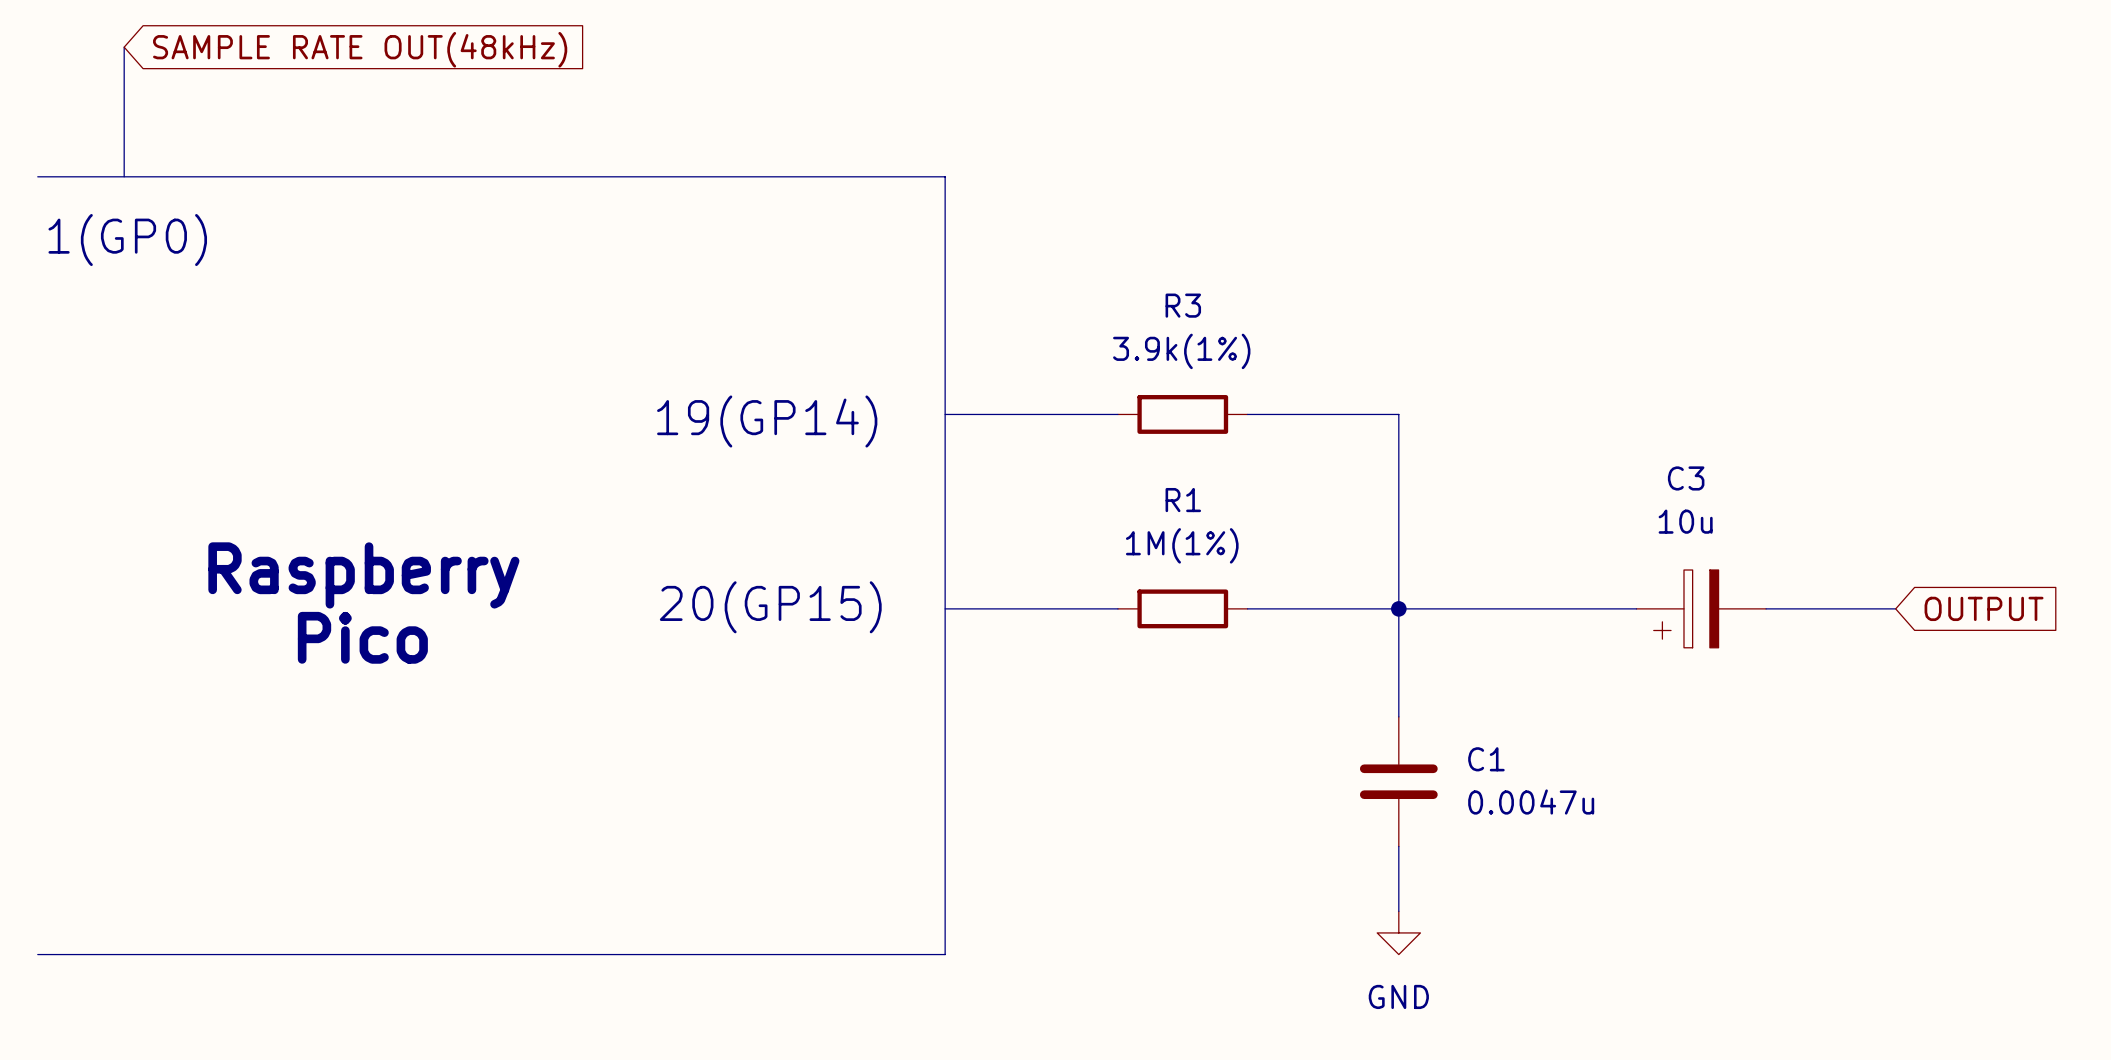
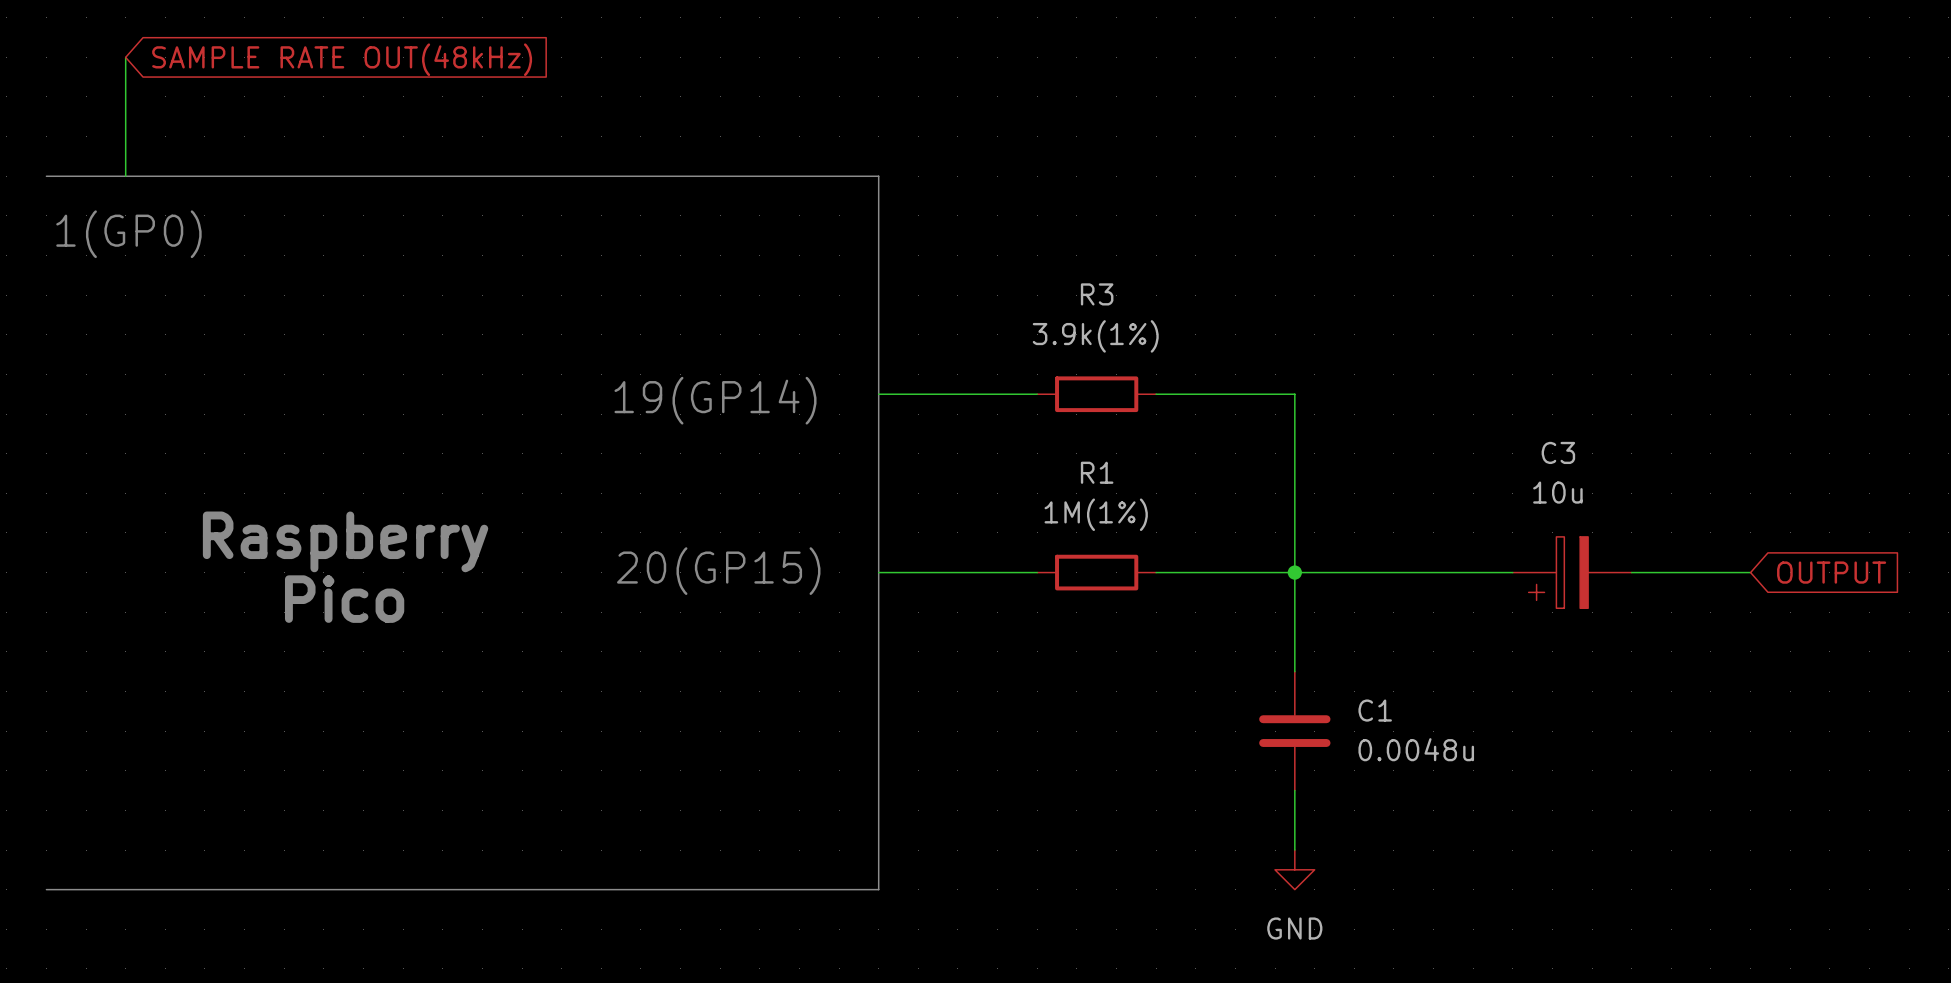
C1 value: 0.0047u (1531, 802) -> 0.0048u (1416, 749)

